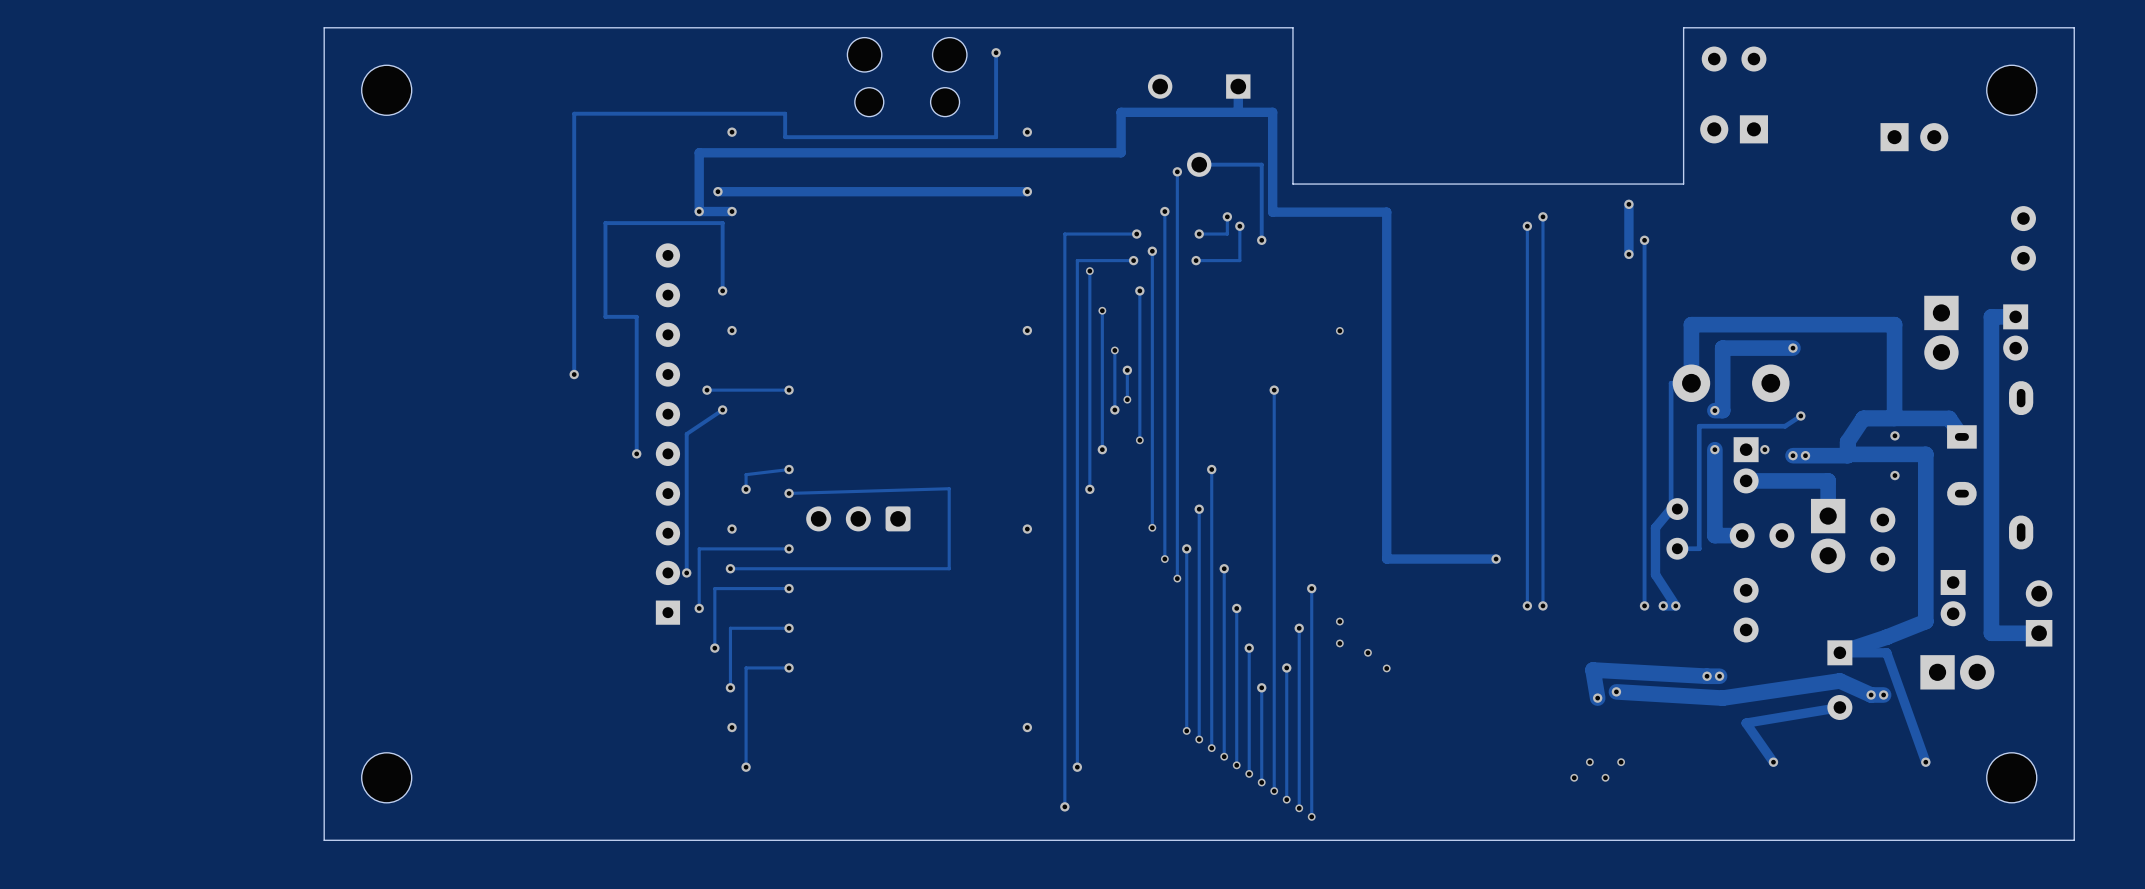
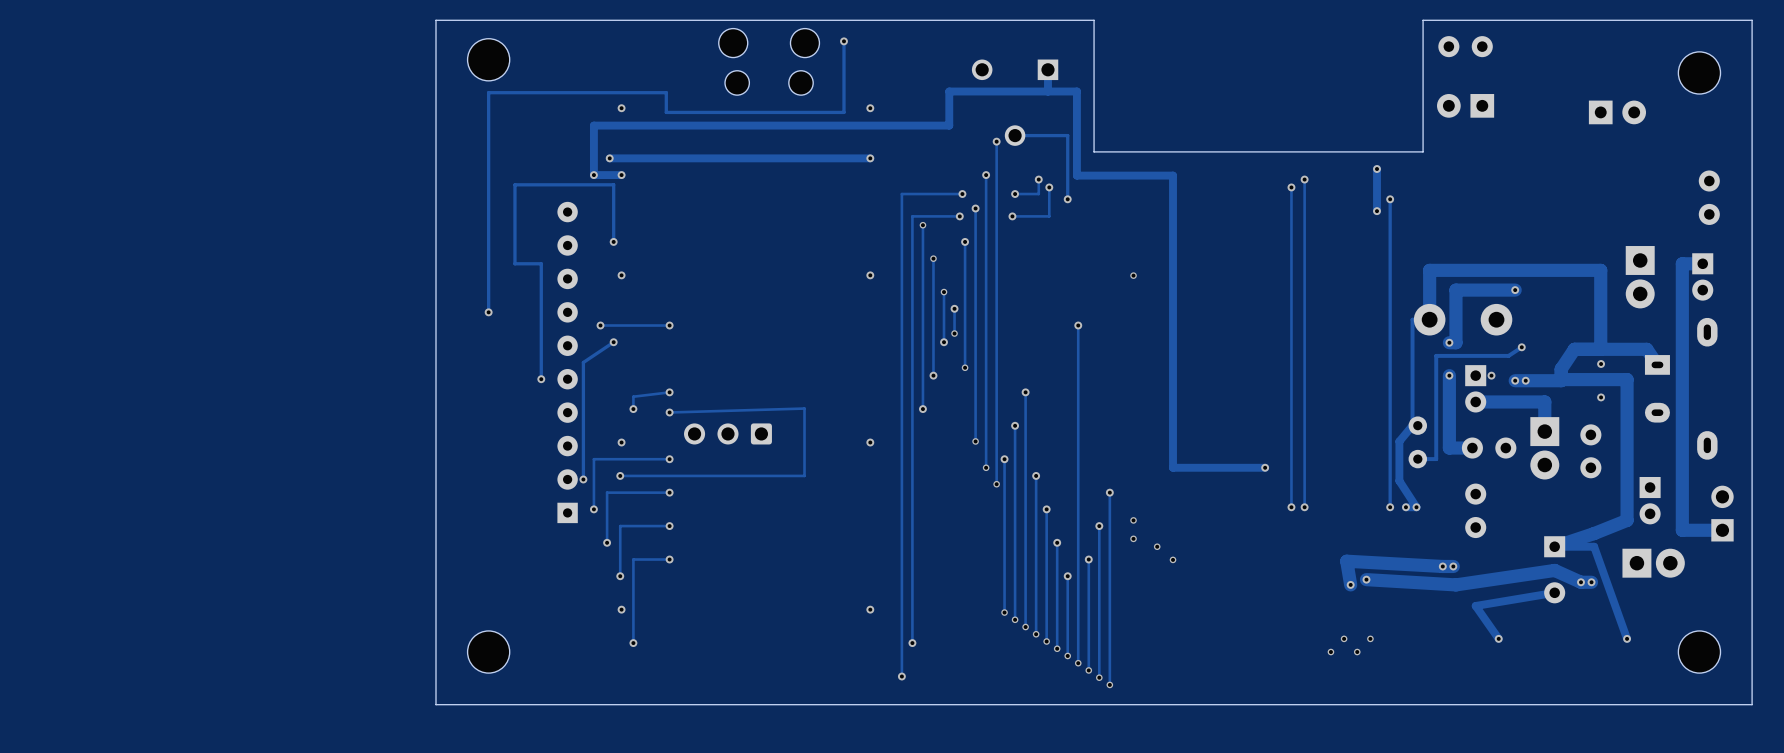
board edge: (511, 27) (324, 27) (324, 840) (511, 840) -> (436, 20) (436, 704)
part position: (386, 90) -> (488, 59)
part position: (386, 777) -> (488, 652)

